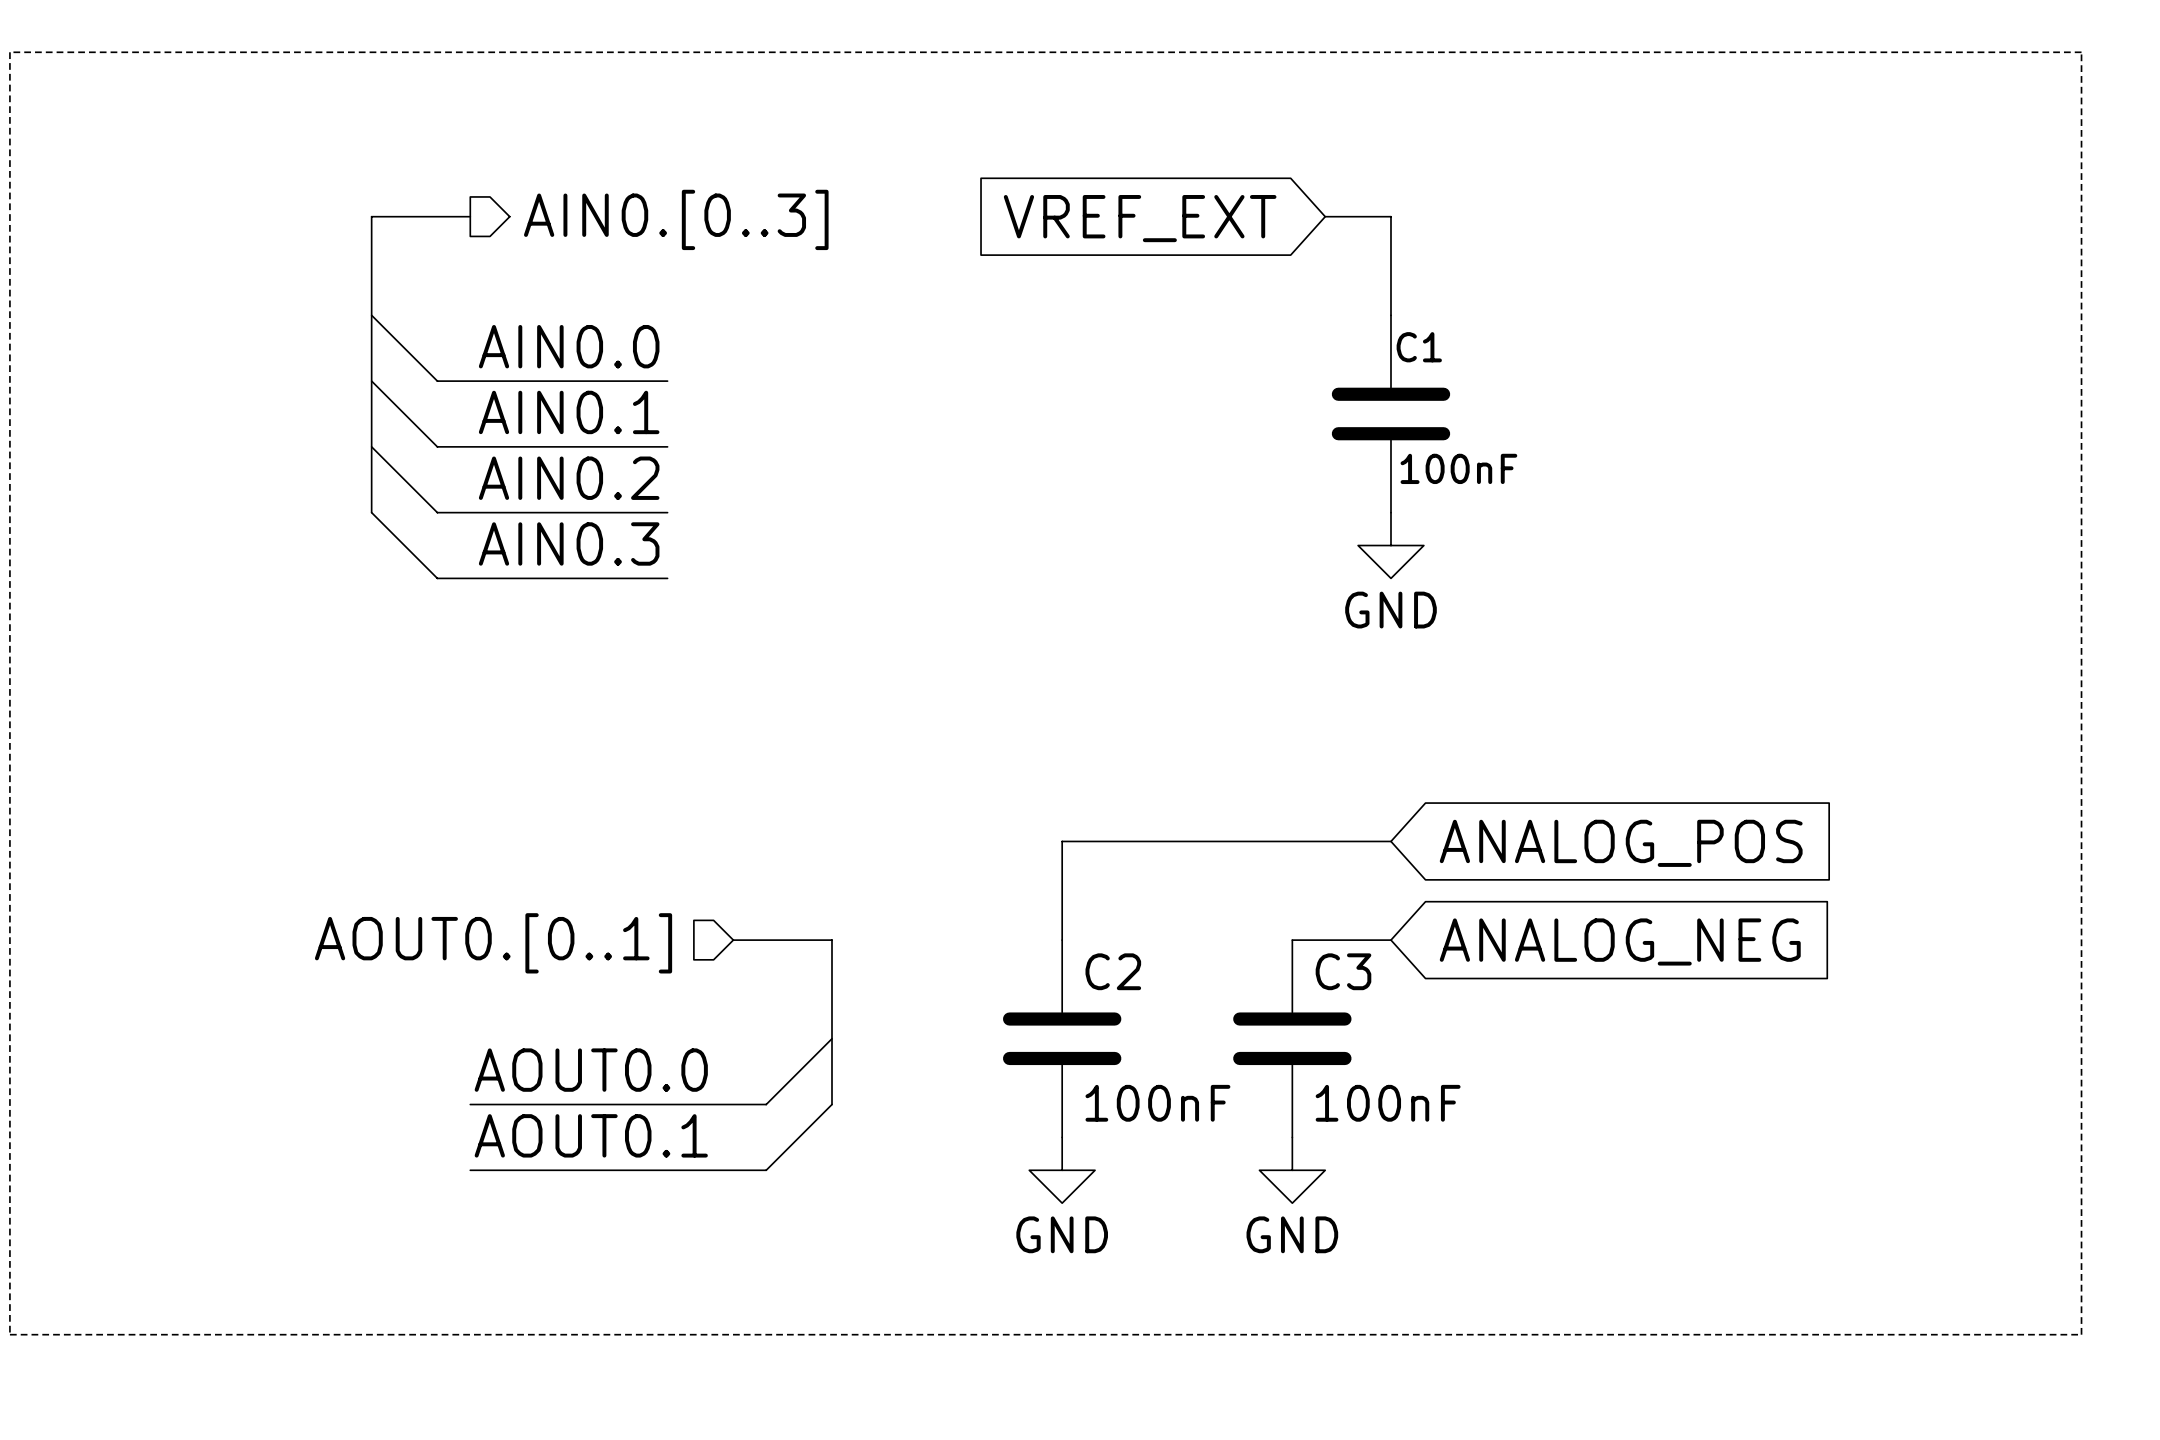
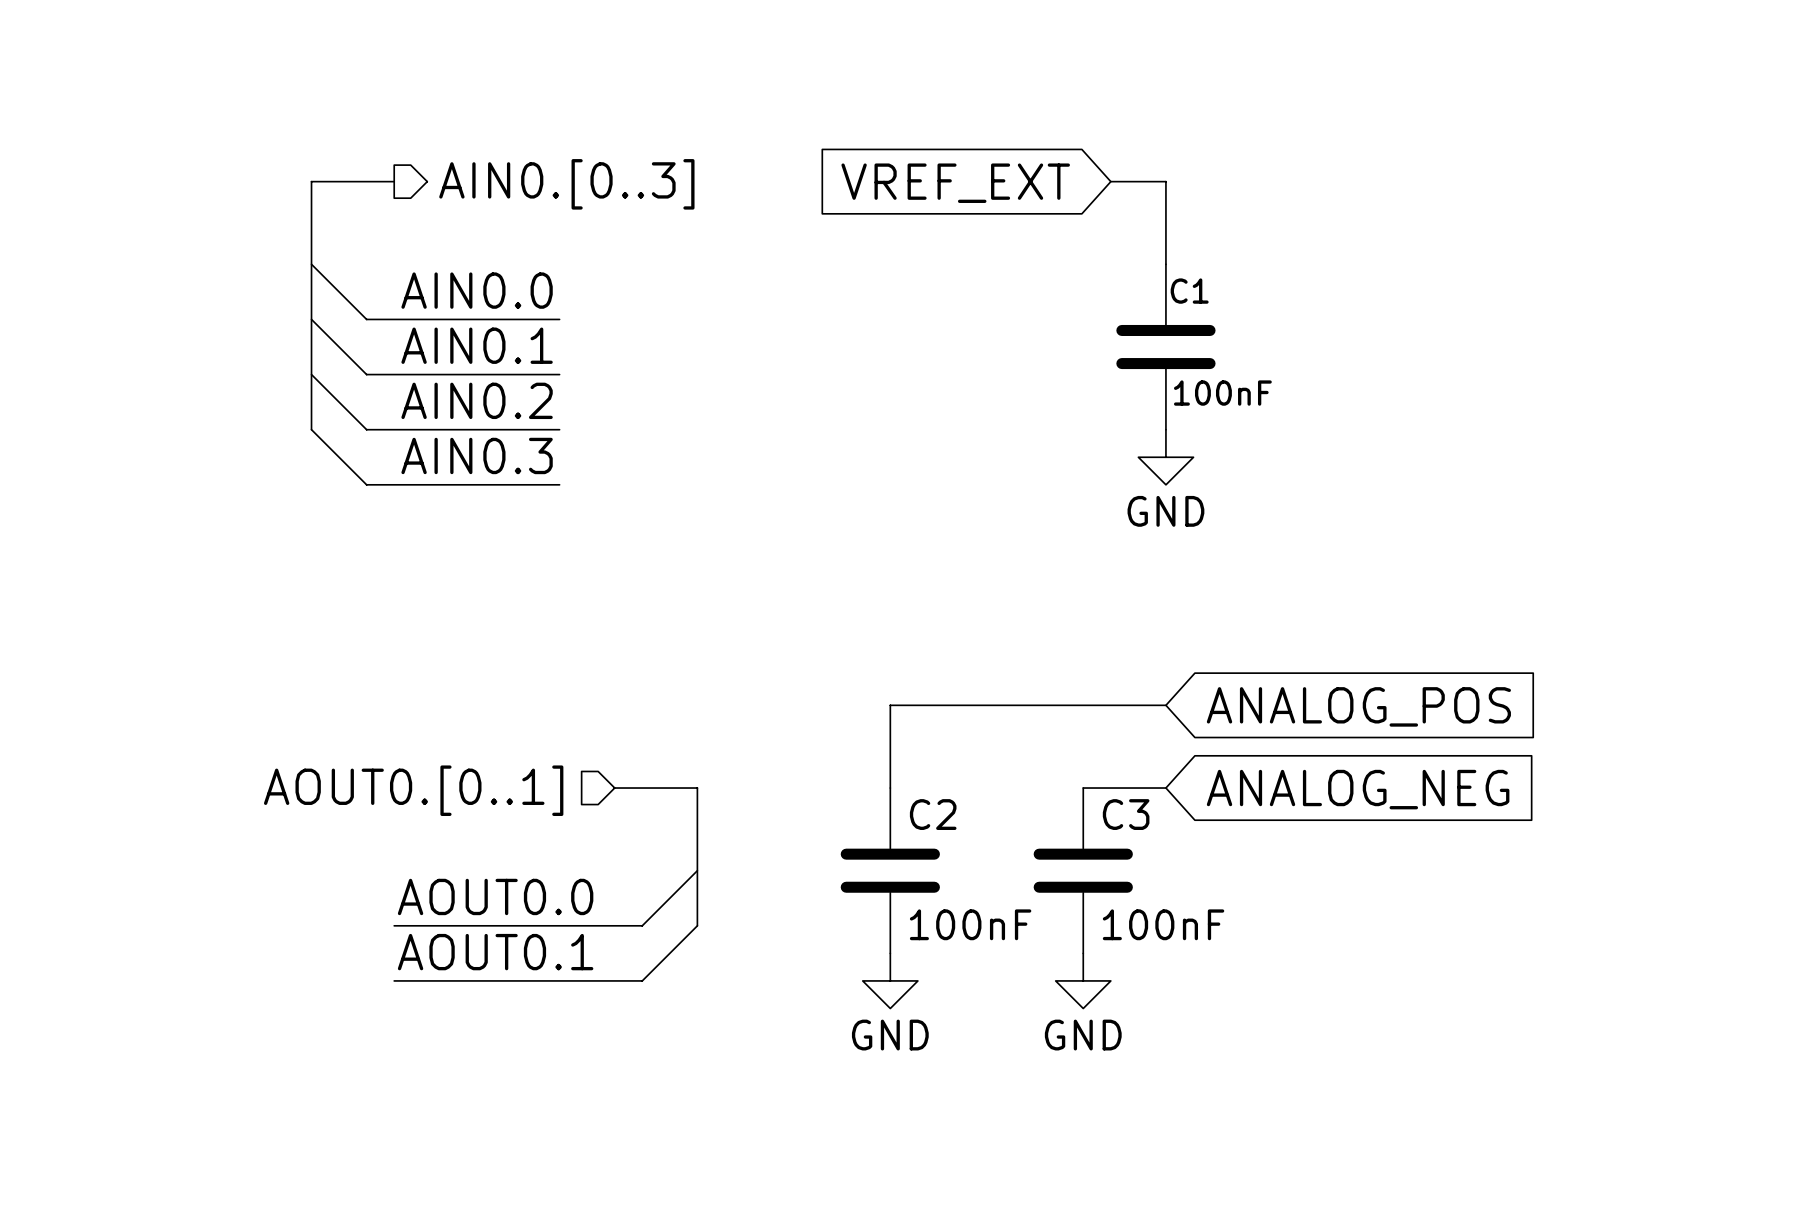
line: (9, 52) (2081, 52) (2081, 1334) (9, 1334) (9, 52) -> none

